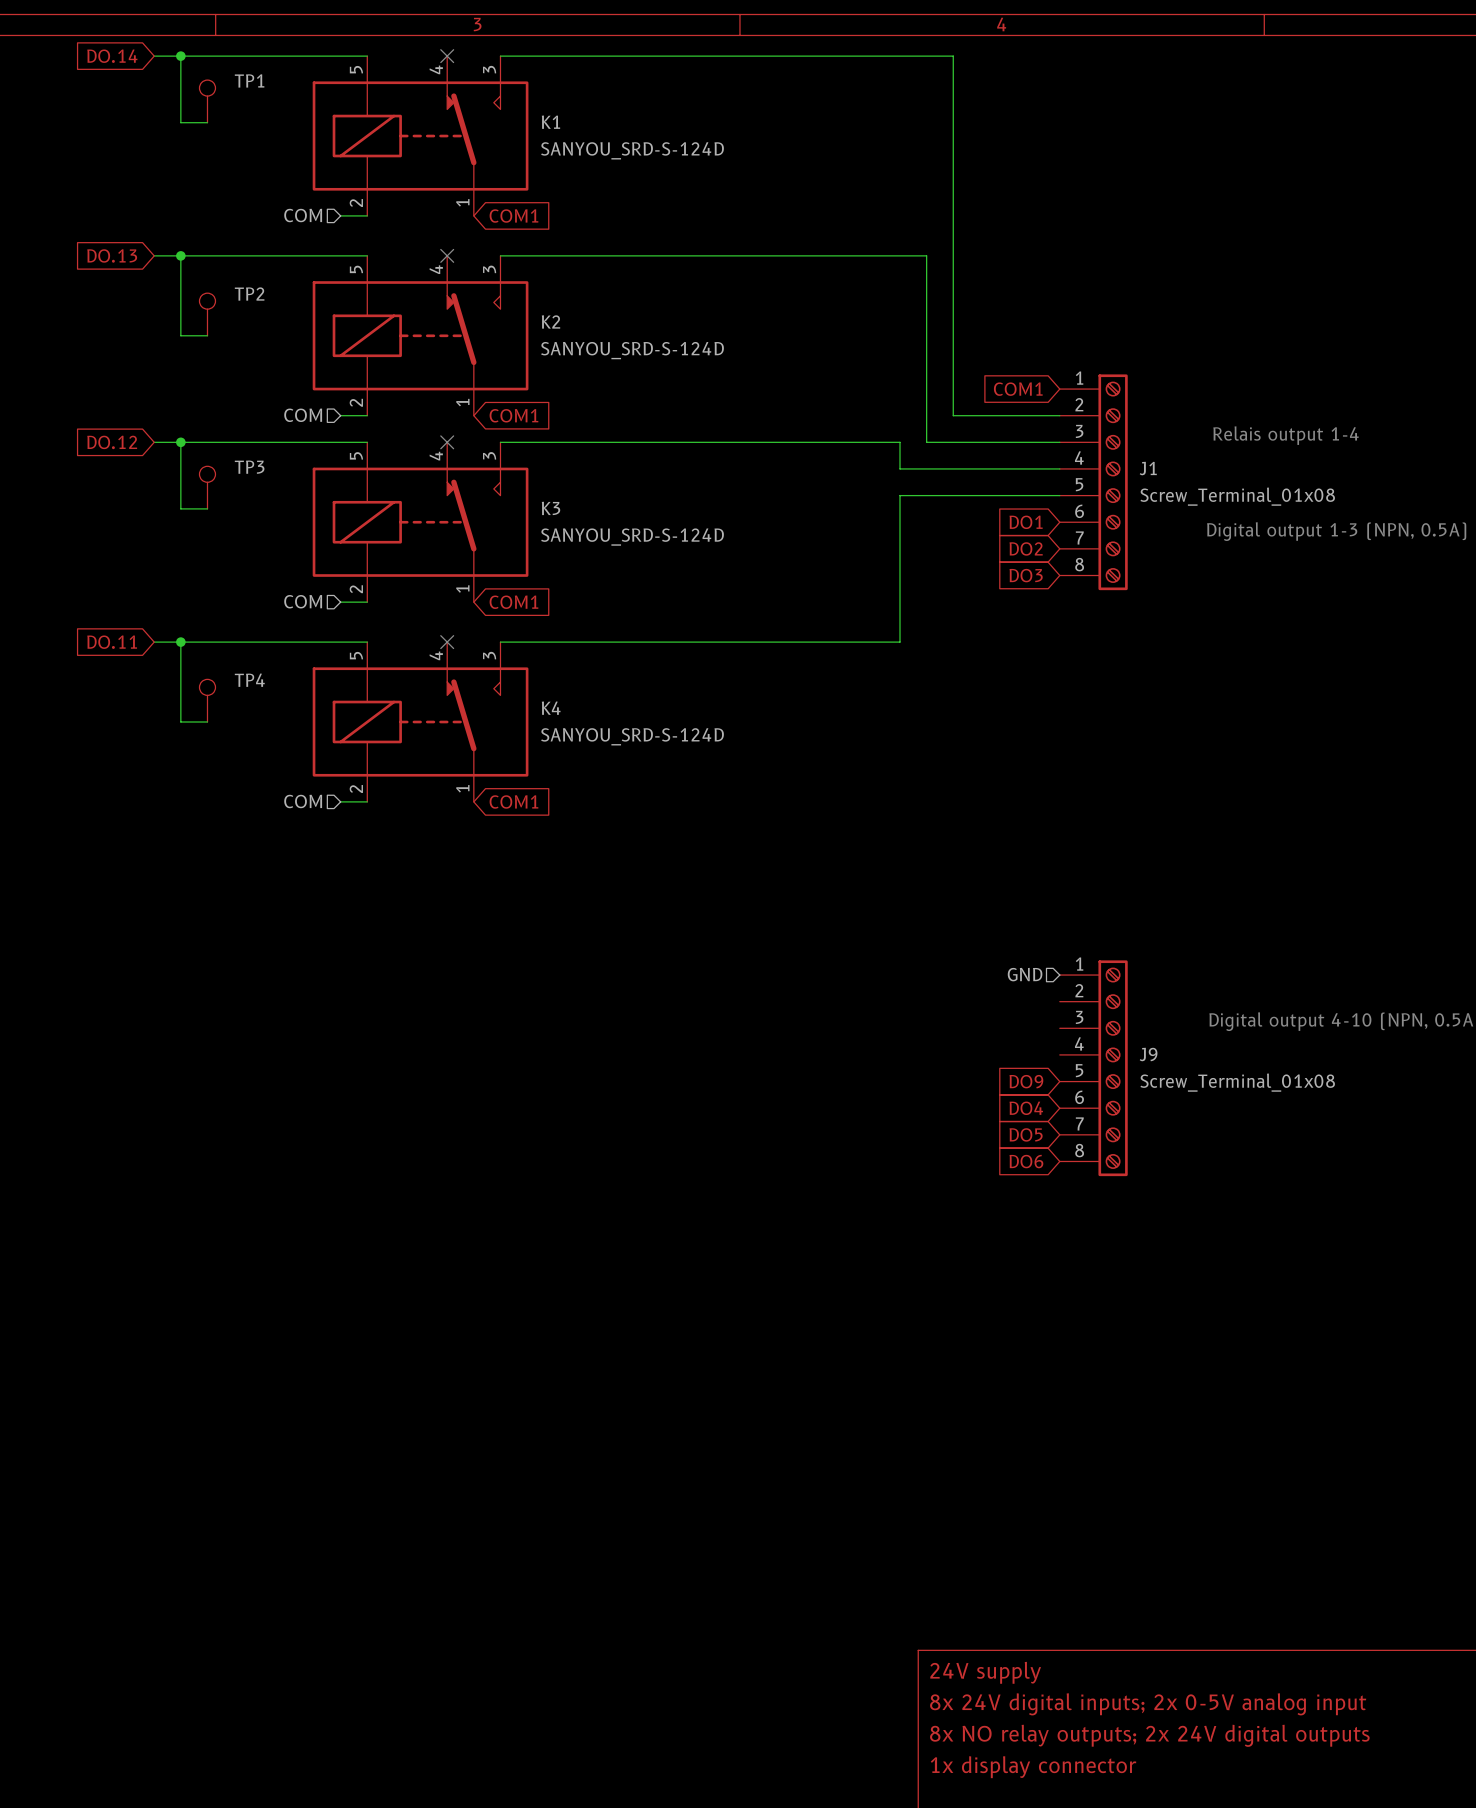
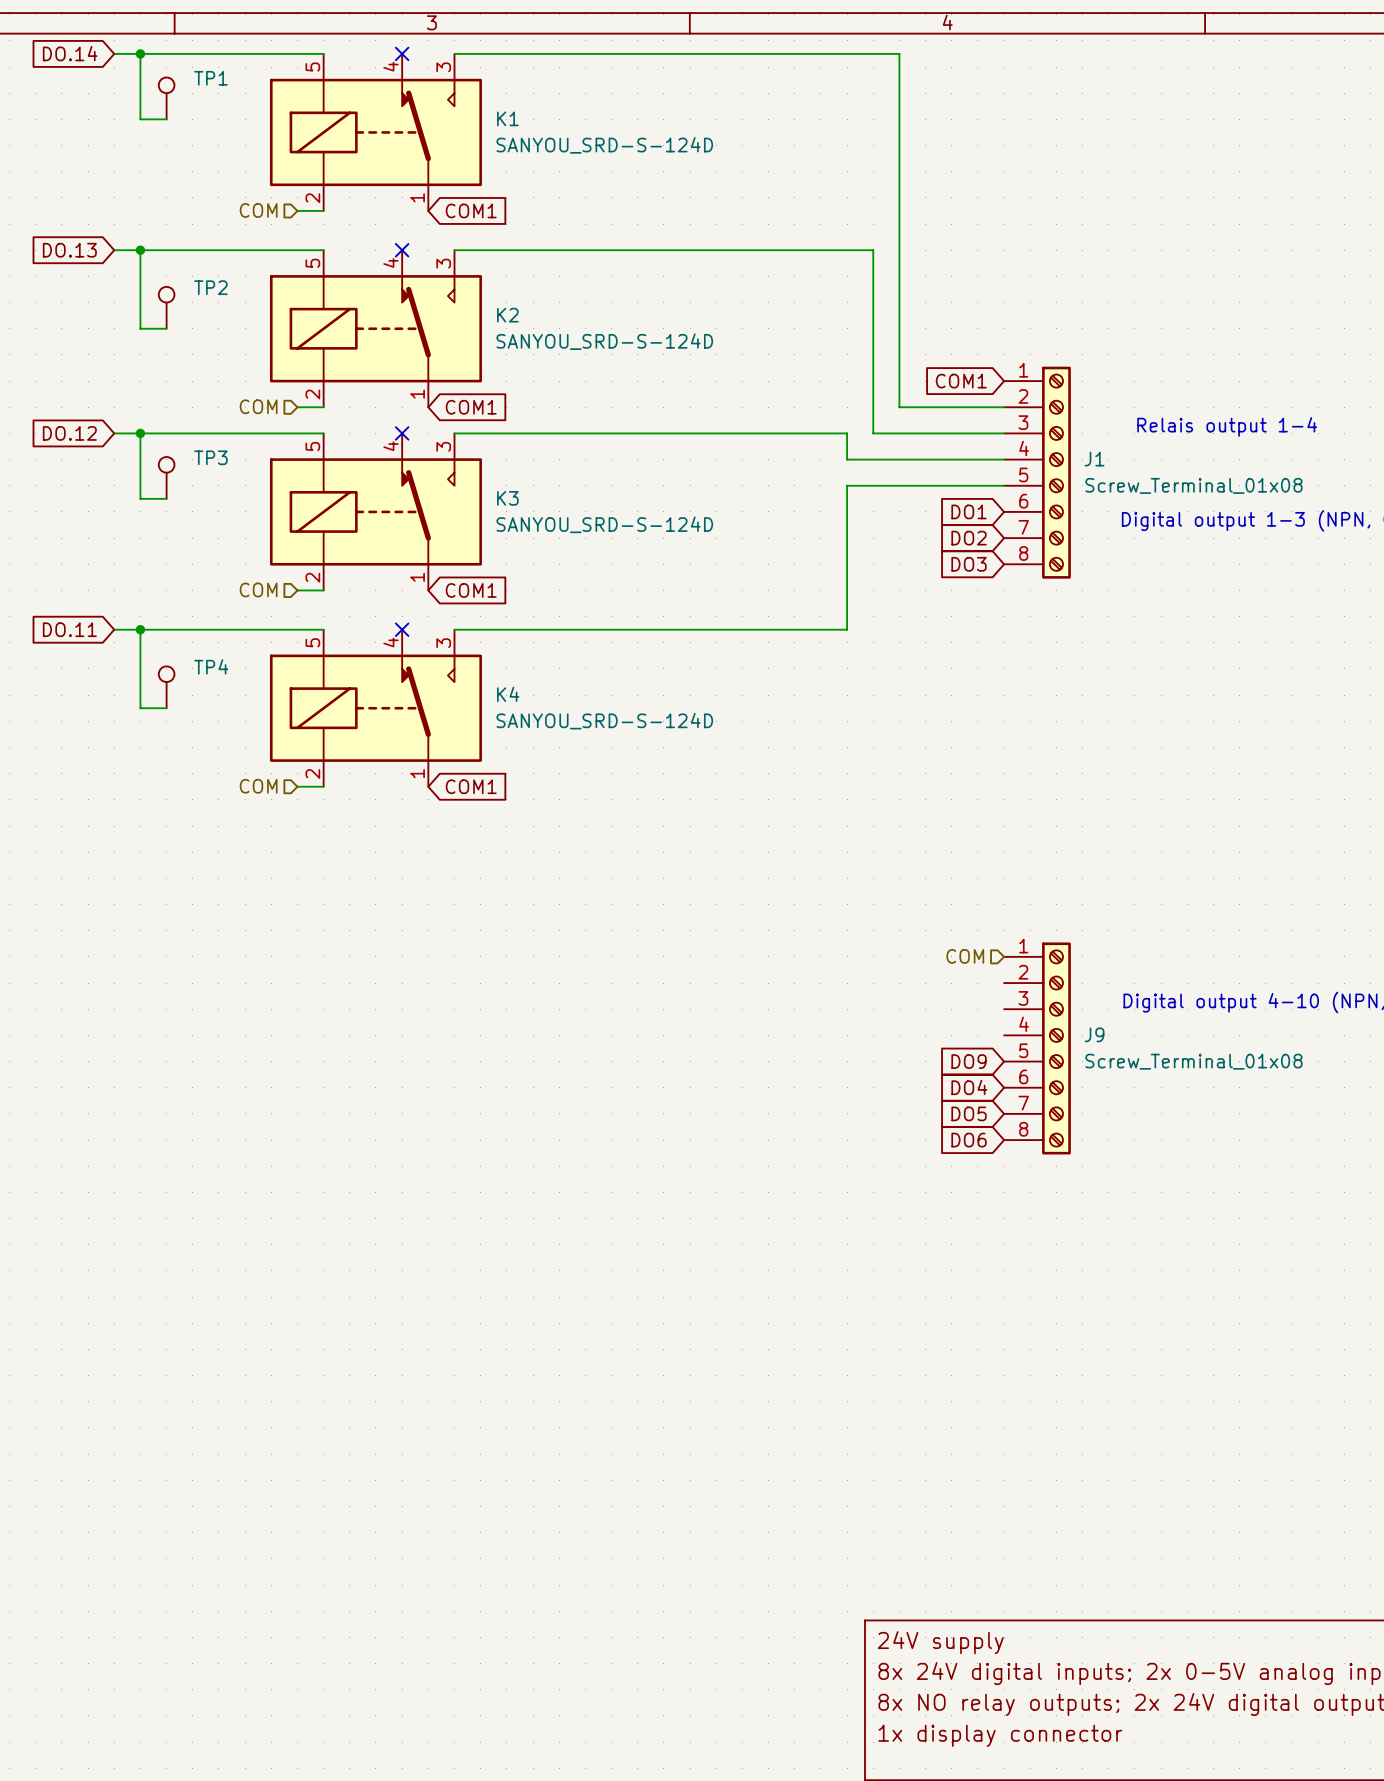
hierarchical label: GND (1025, 974) -> COM (965, 956)

